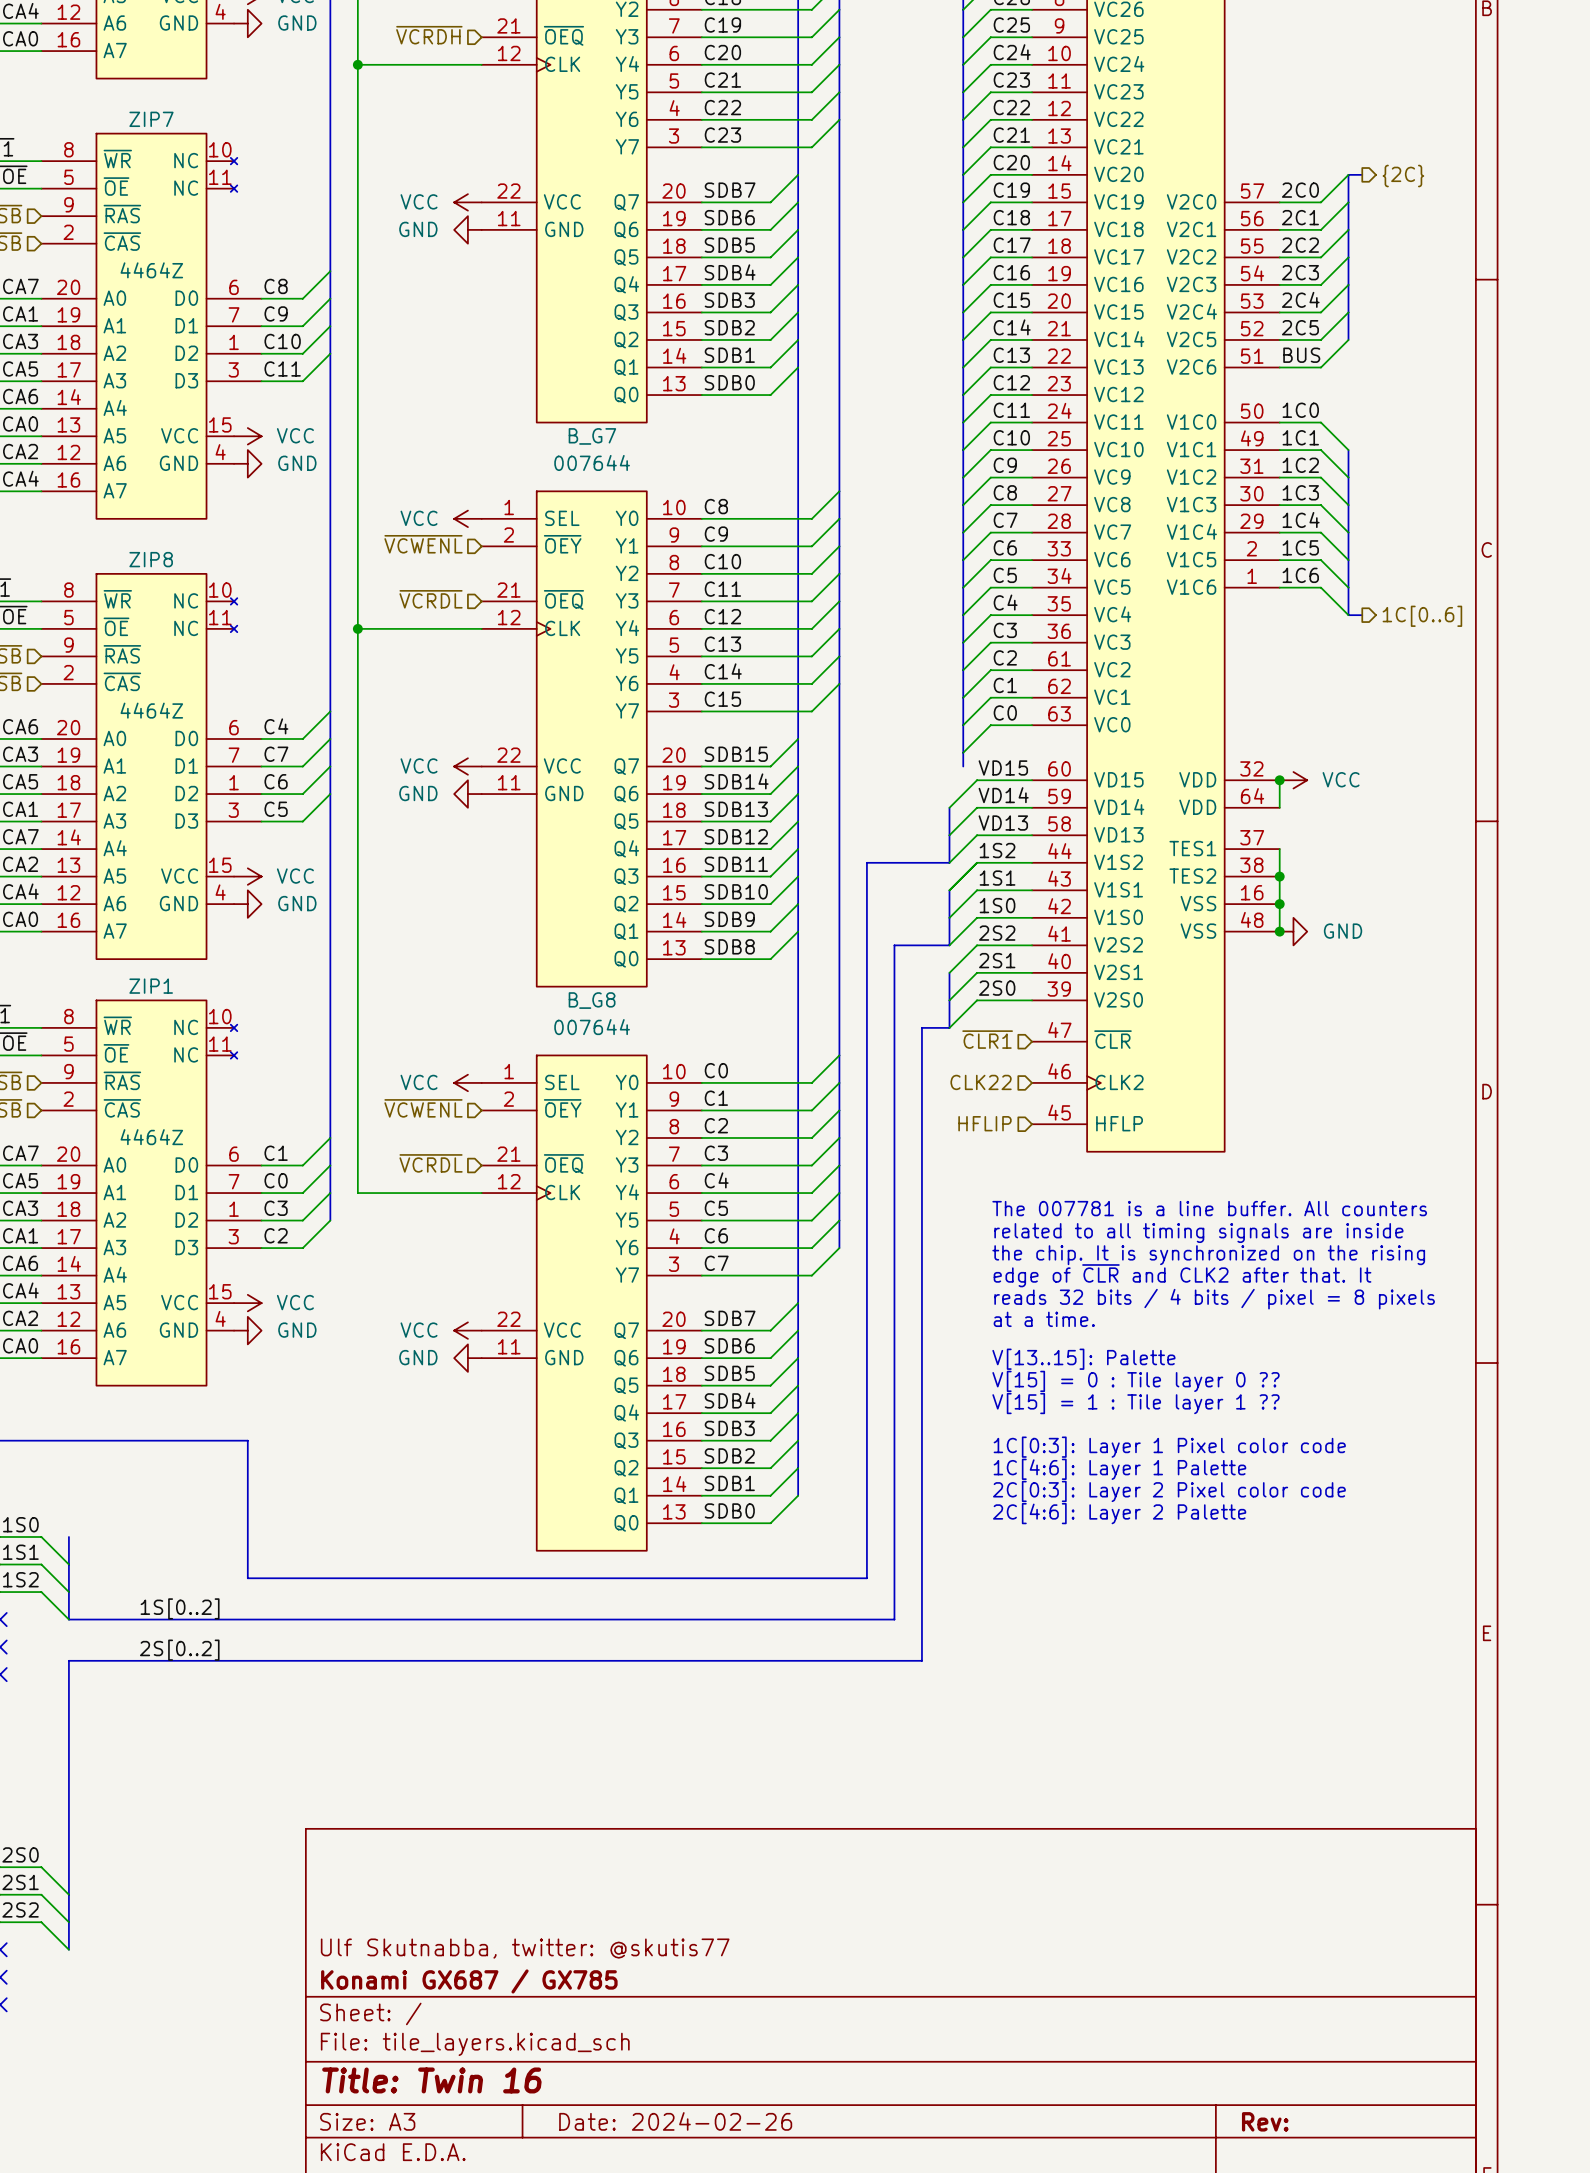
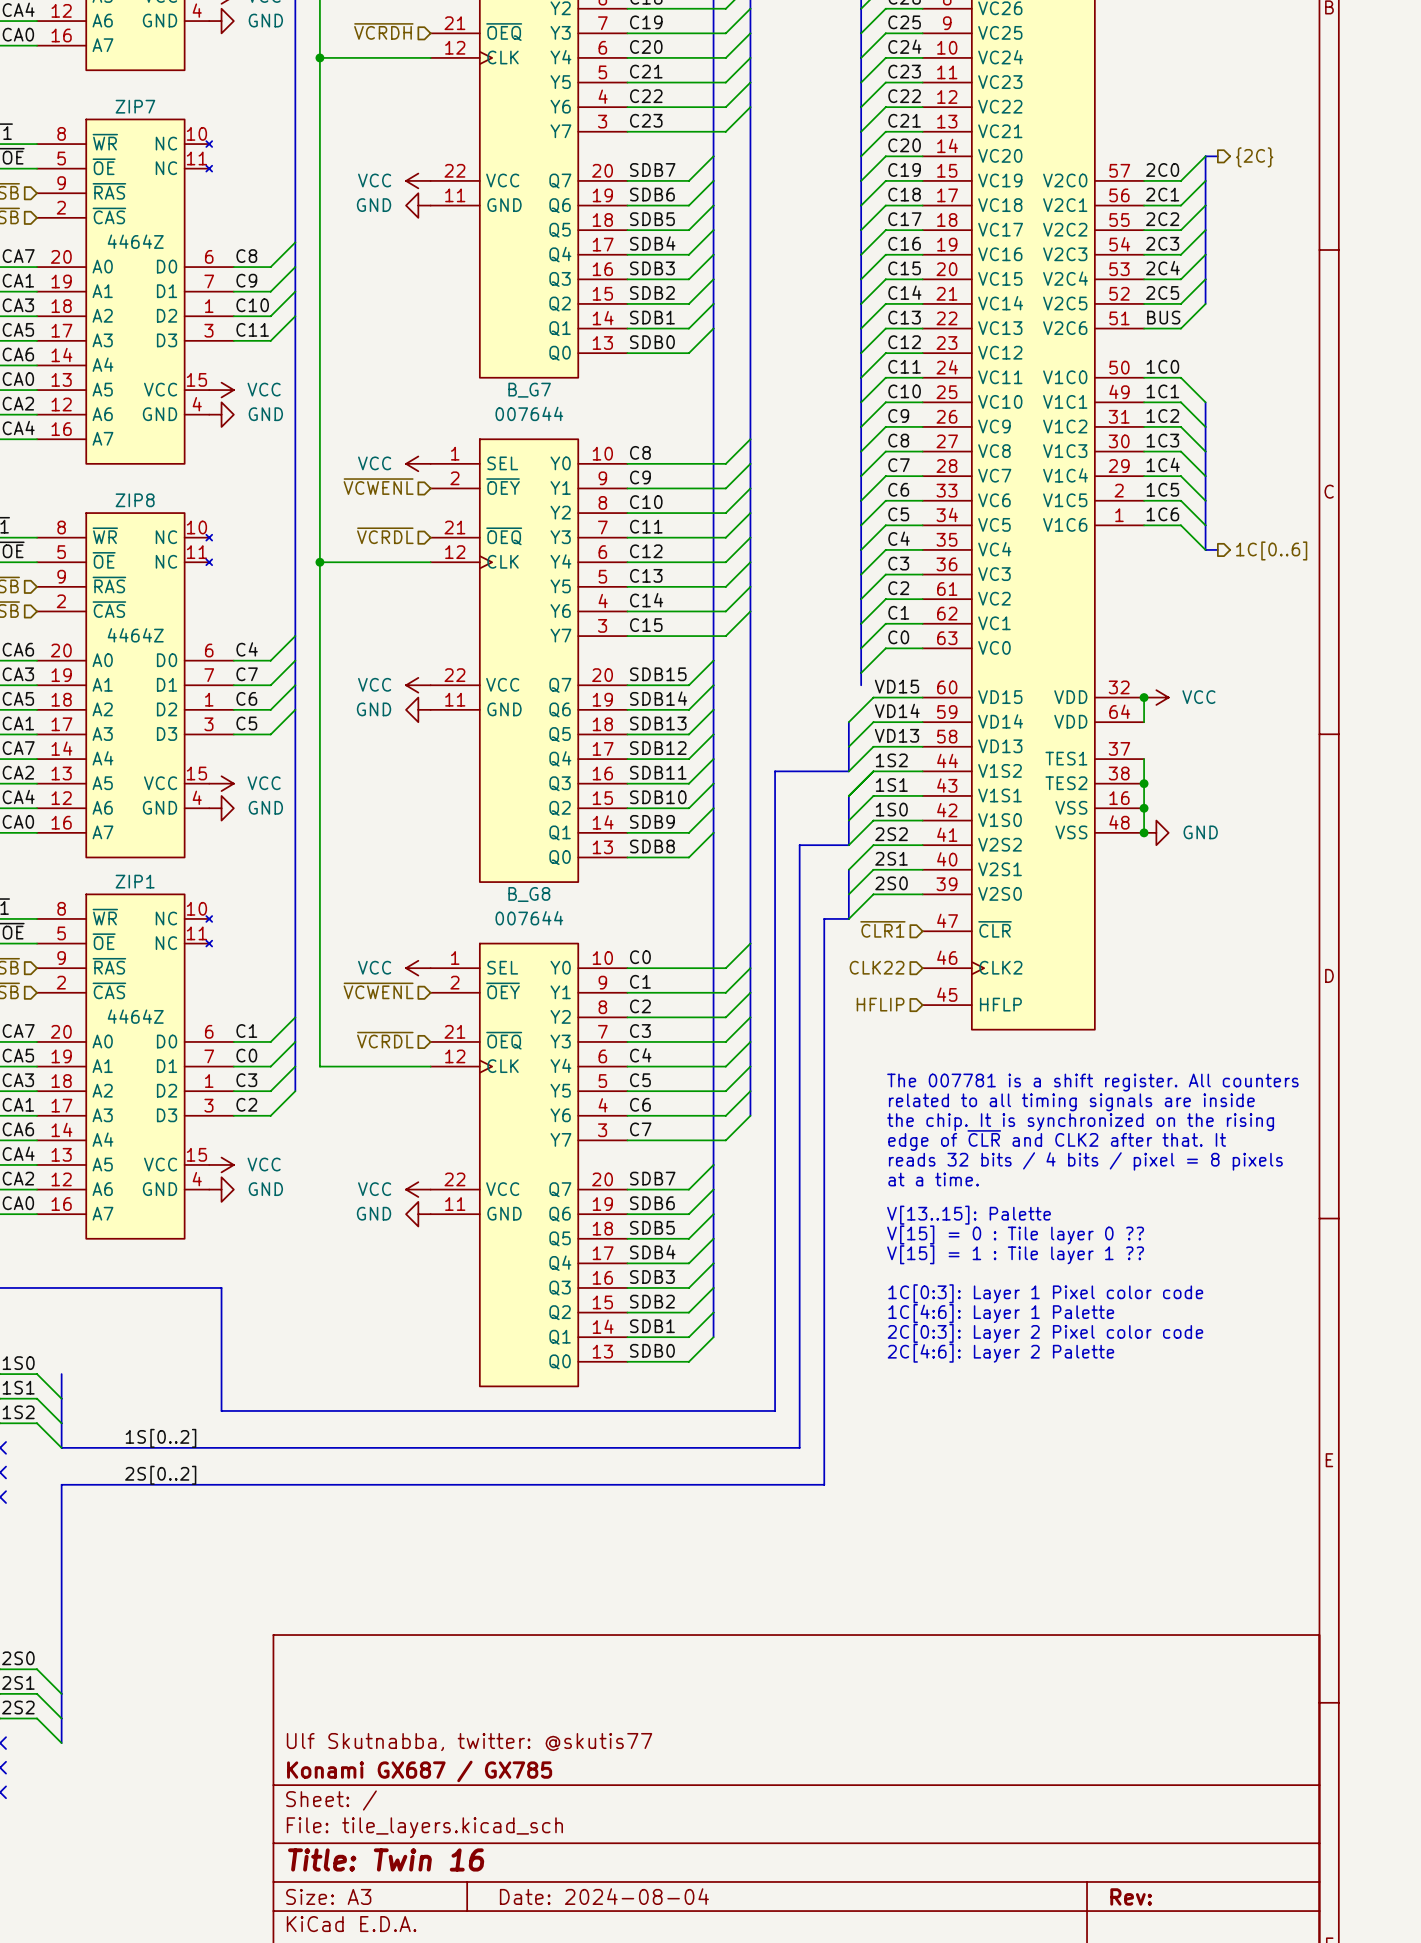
text: The 007781 is a line buffer. All counters (1209, 1208) -> The 007781 is a shift register. All counters (1092, 1082)
title block: Date: 2024-02-26 (675, 2121) -> Date: 2024-08-04 (604, 1896)

